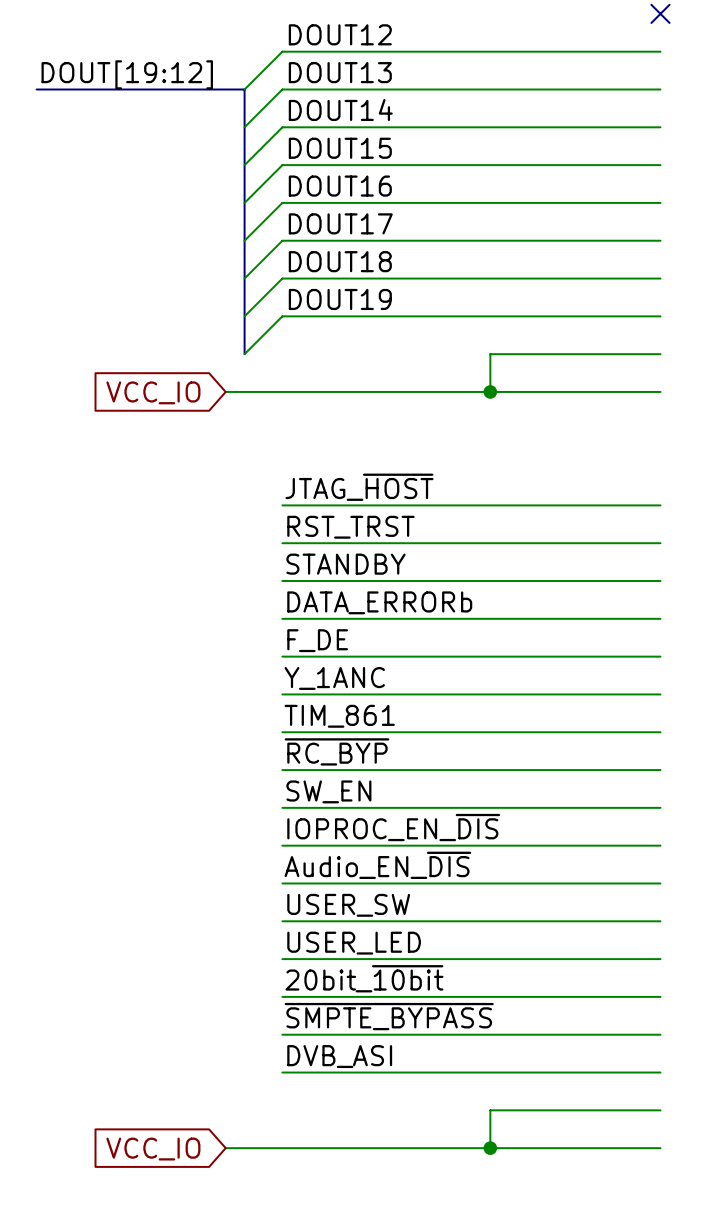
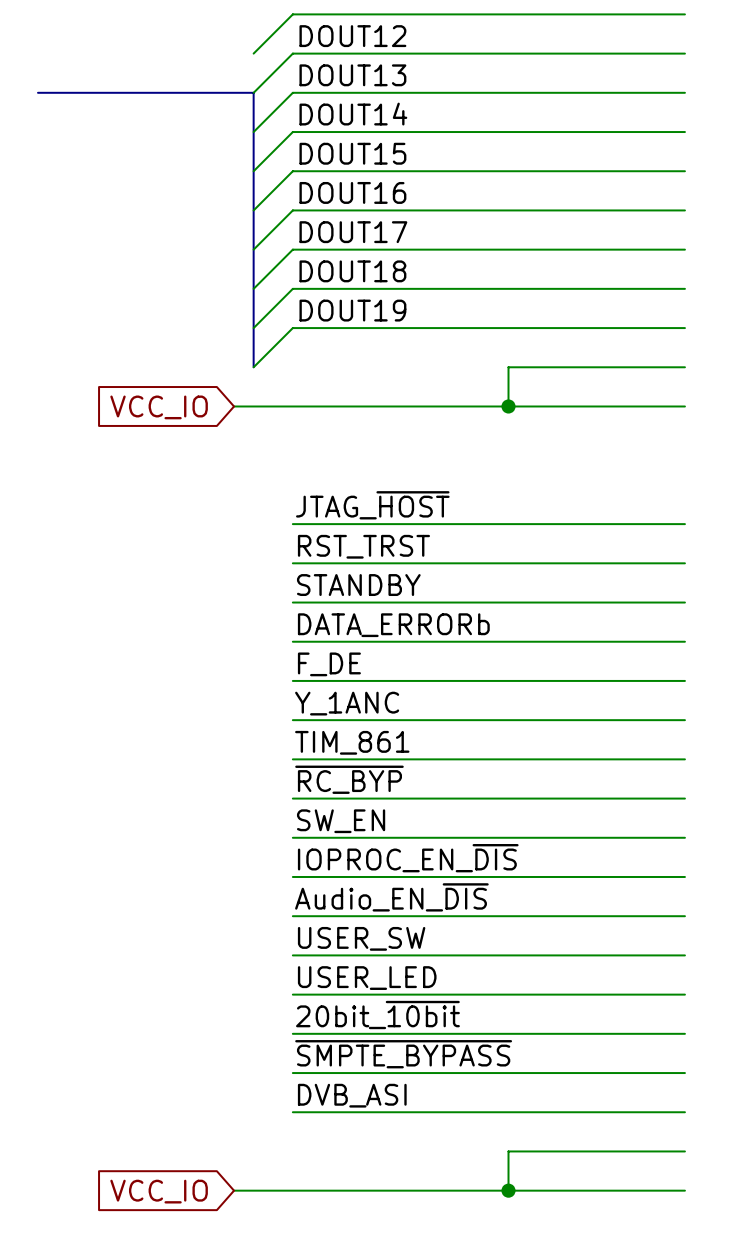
wire: none -> (684, 14) (292, 14) (253, 53)
no-connect mark: (660, 13) -> none
label: DOUT[19:12] (127, 74) -> none

